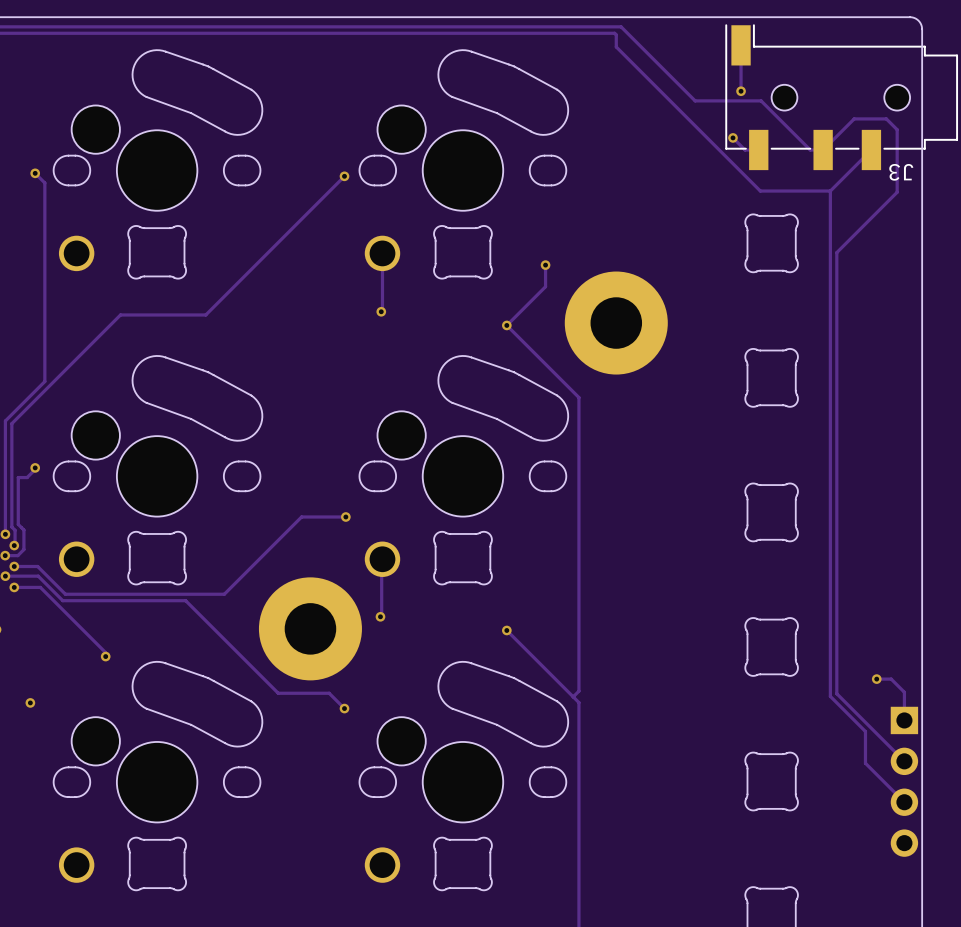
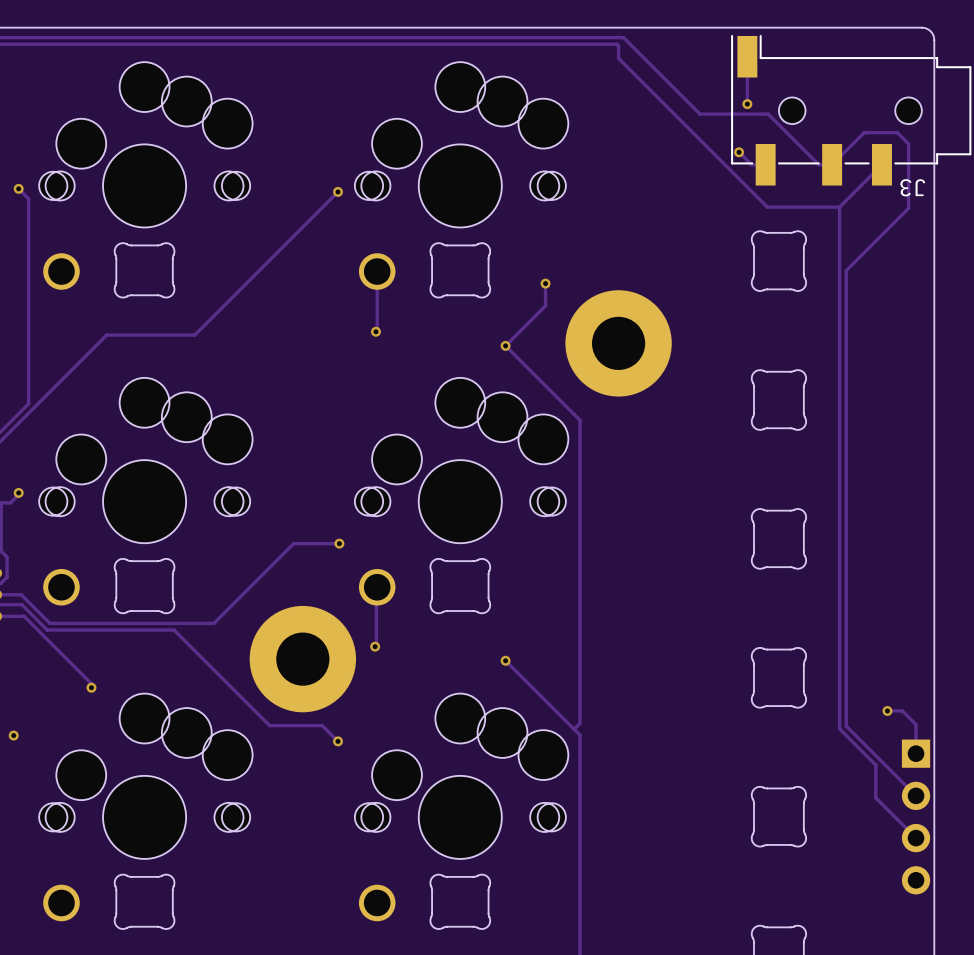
part footprint: [52, 49, 264, 272] -> [39, 62, 253, 290]
part footprint: [358, 49, 569, 272] -> [354, 62, 569, 290]
part footprint: [52, 355, 264, 577] -> [39, 377, 253, 606]
part footprint: [358, 355, 569, 577] -> [354, 377, 569, 606]
part footprint: [52, 661, 264, 883] -> [39, 693, 253, 922]
part footprint: [358, 661, 569, 883] -> [354, 693, 569, 922]

